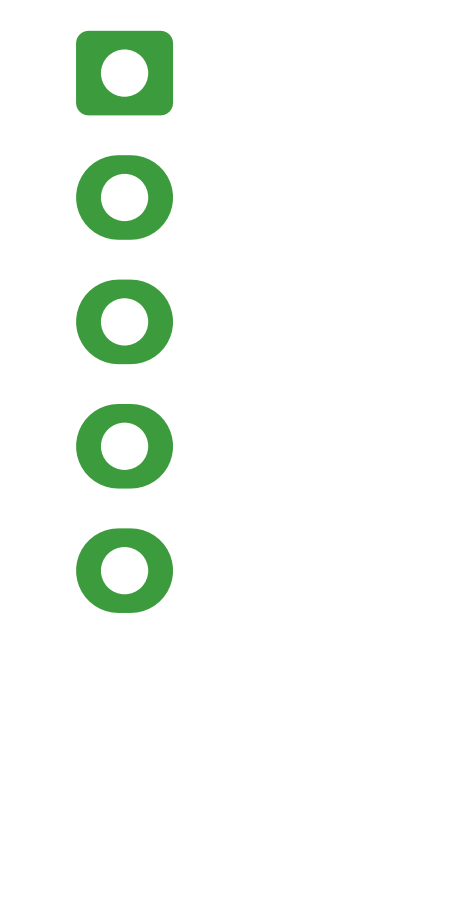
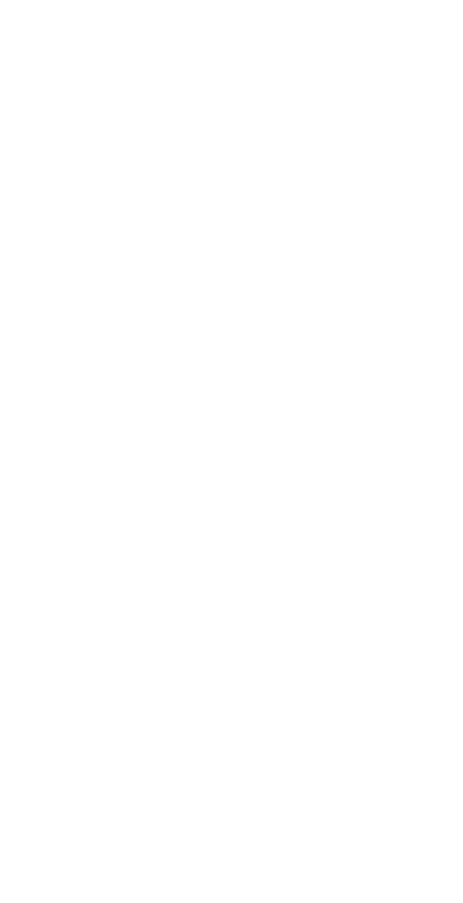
part: (124, 321) -> none

